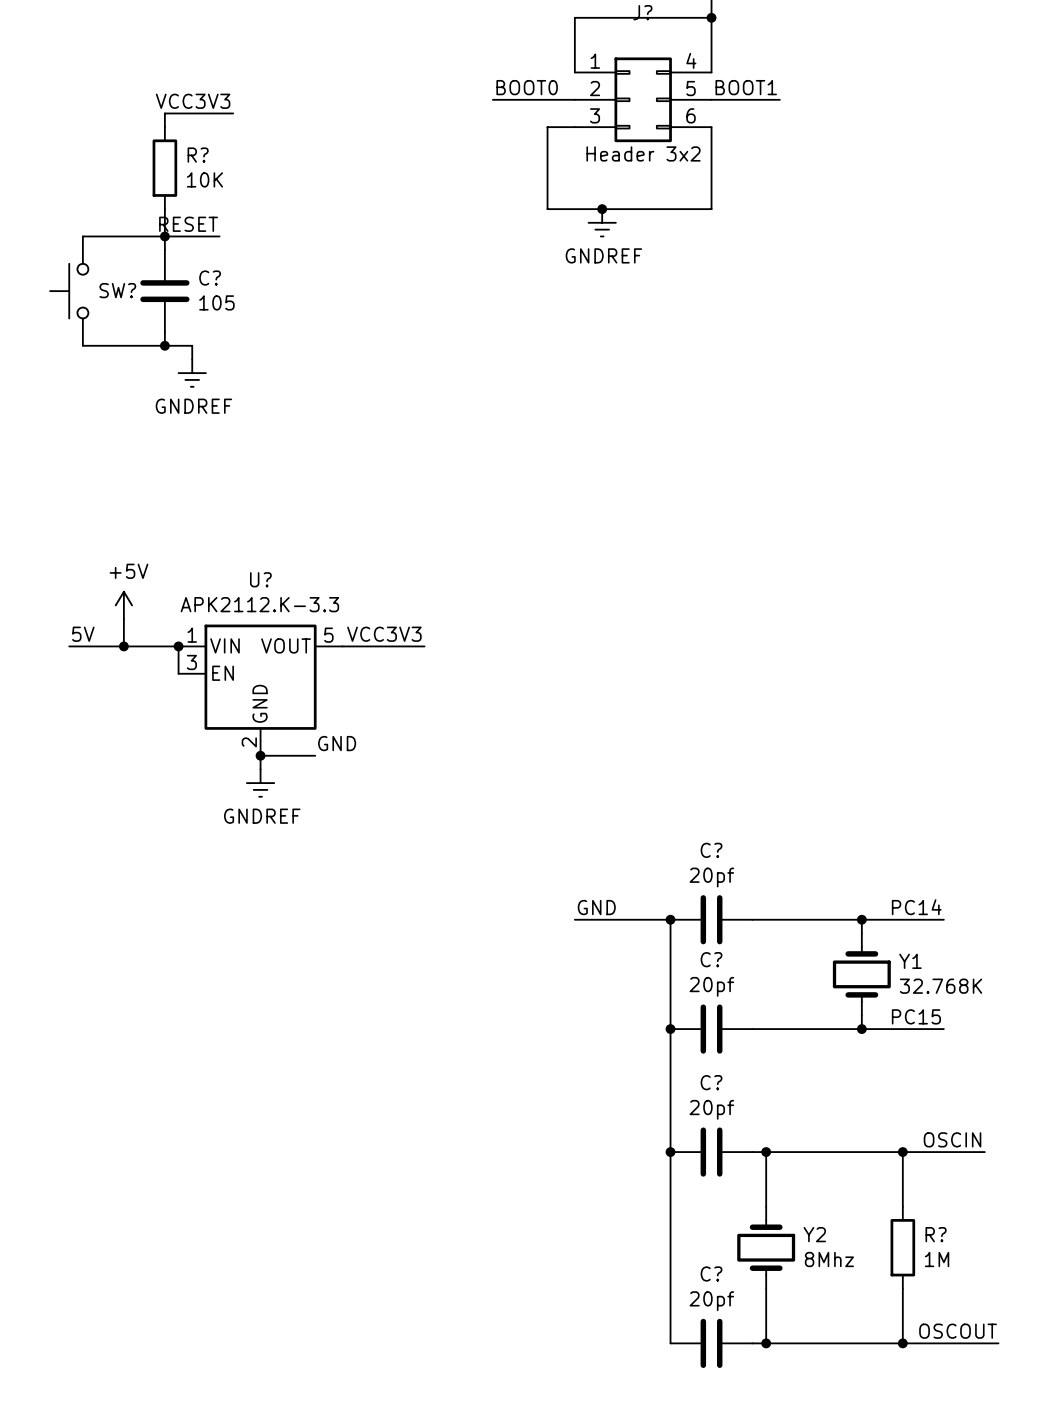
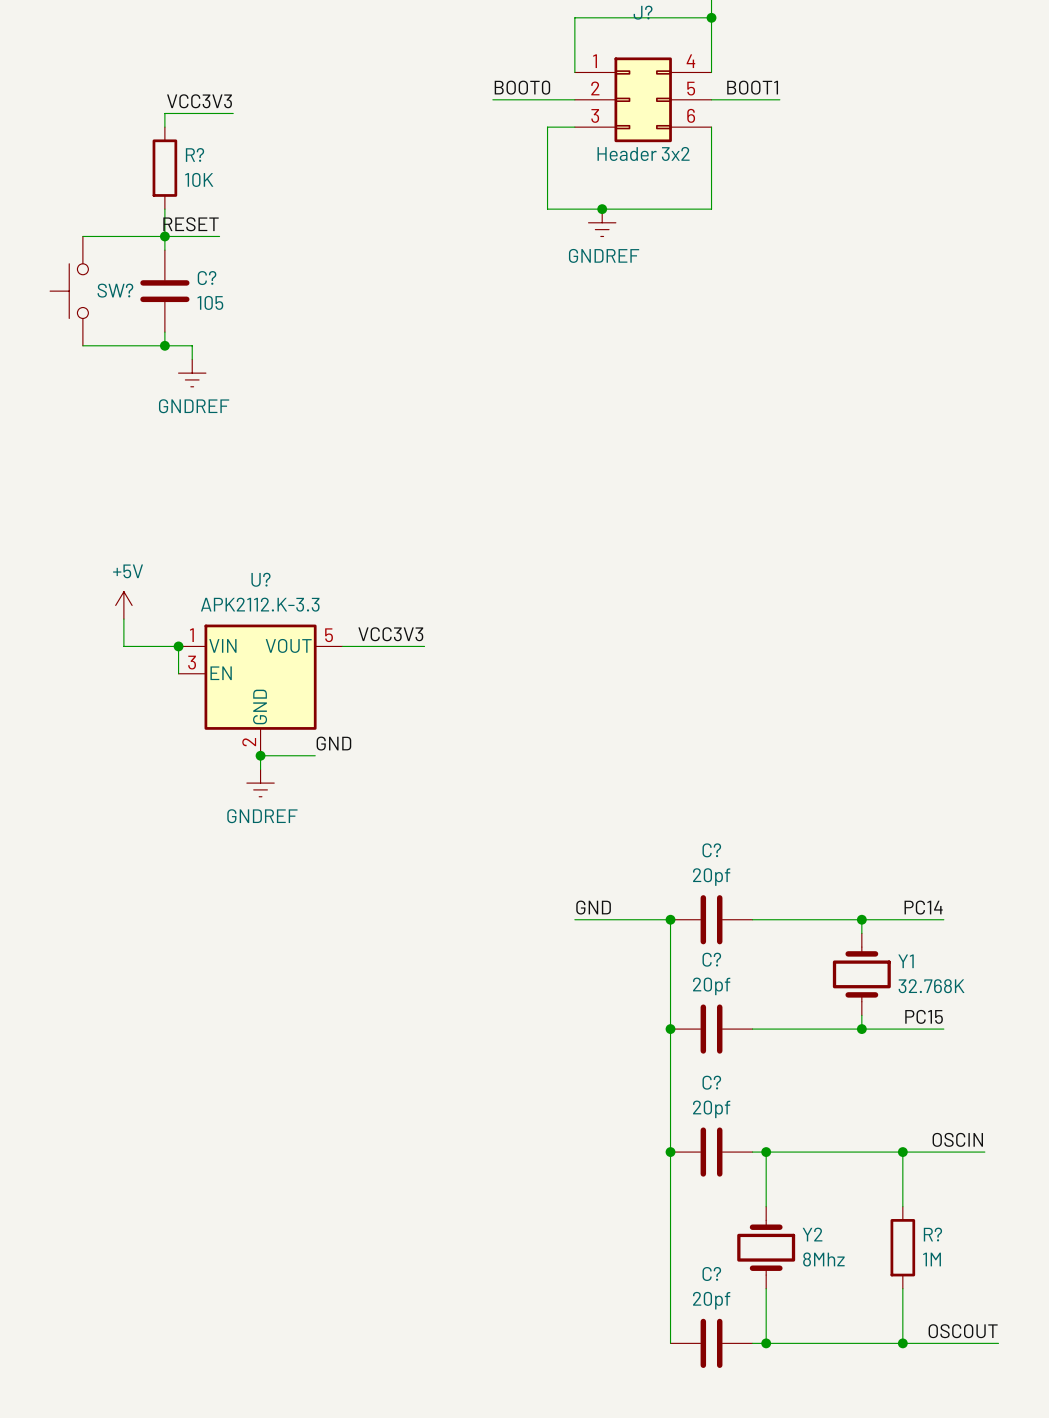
label: 5V (83, 634) -> none
wire: (69, 646) (123, 646) -> none
junction: (123, 646) -> none

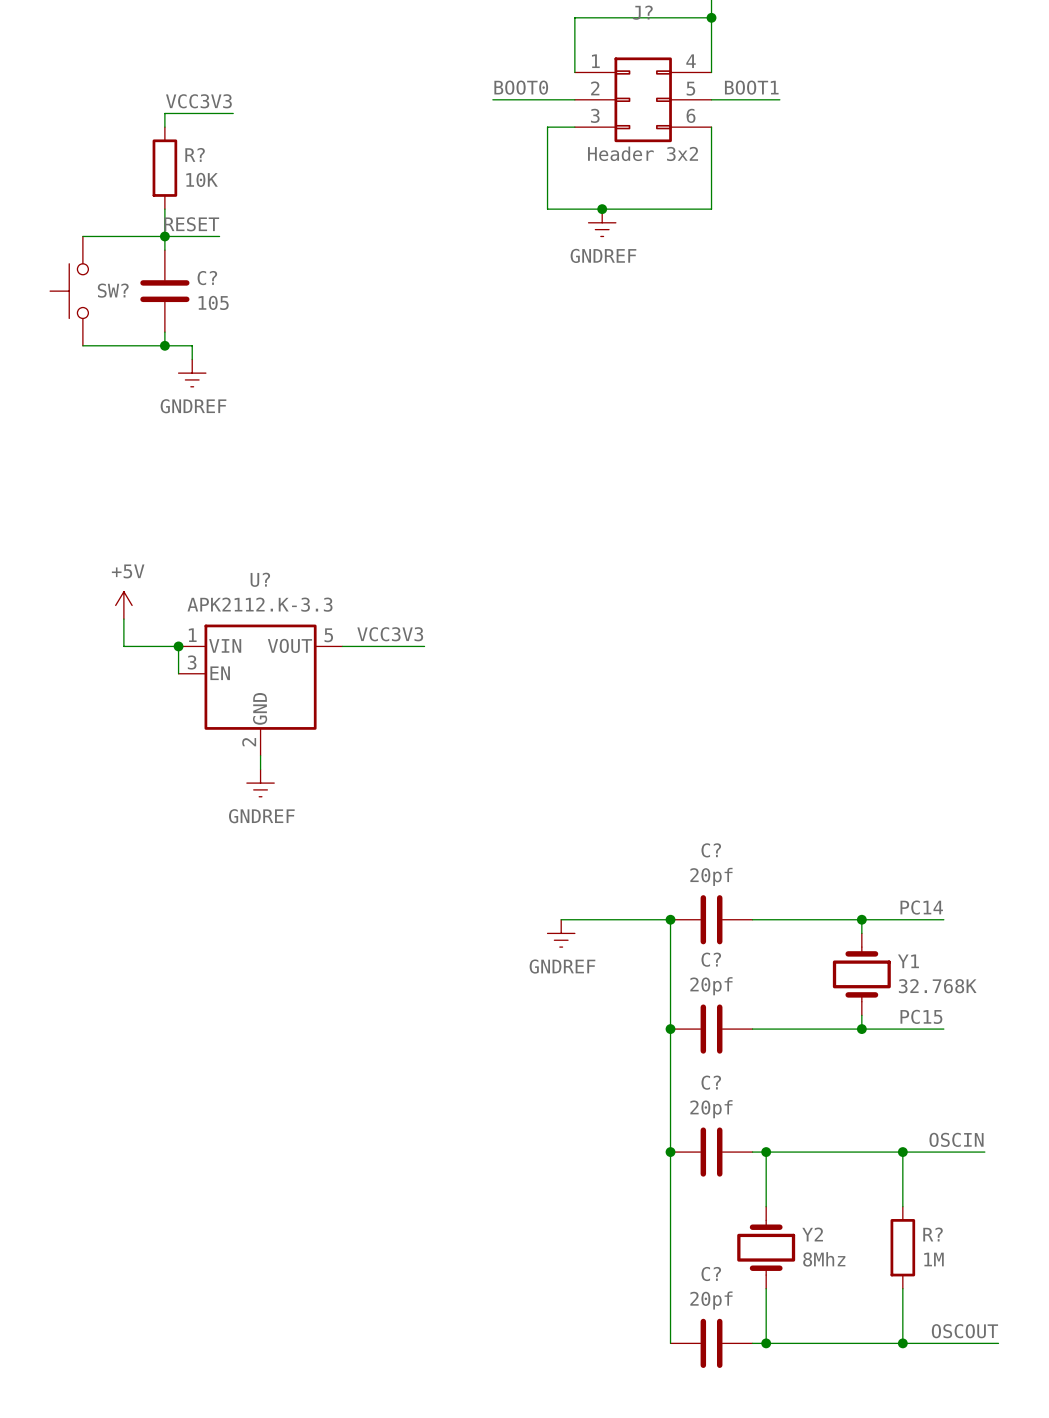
label: GND (333, 743) -> none
wire: (260, 755) (315, 755) -> none
junction: (260, 755) -> none
label: GND (593, 907) -> none
wire: none -> (561, 919) (574, 919)
power symbol: none -> GNDREF (561, 933)

